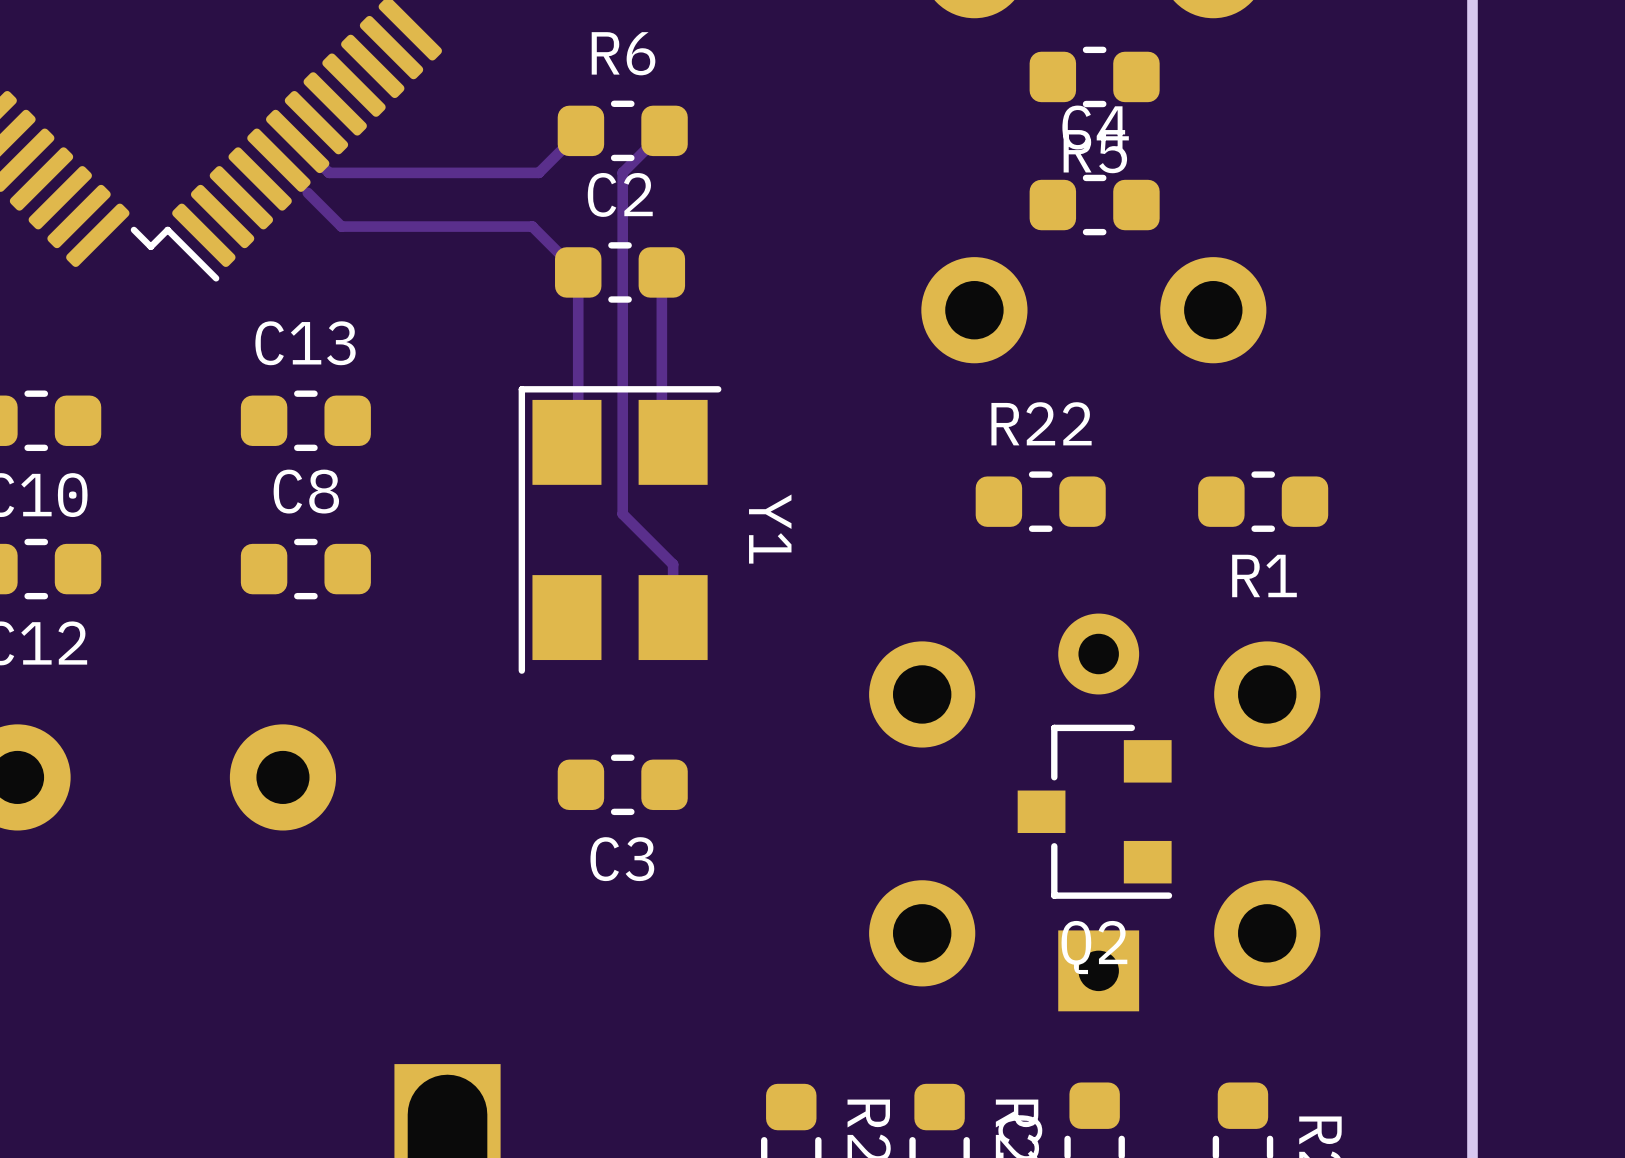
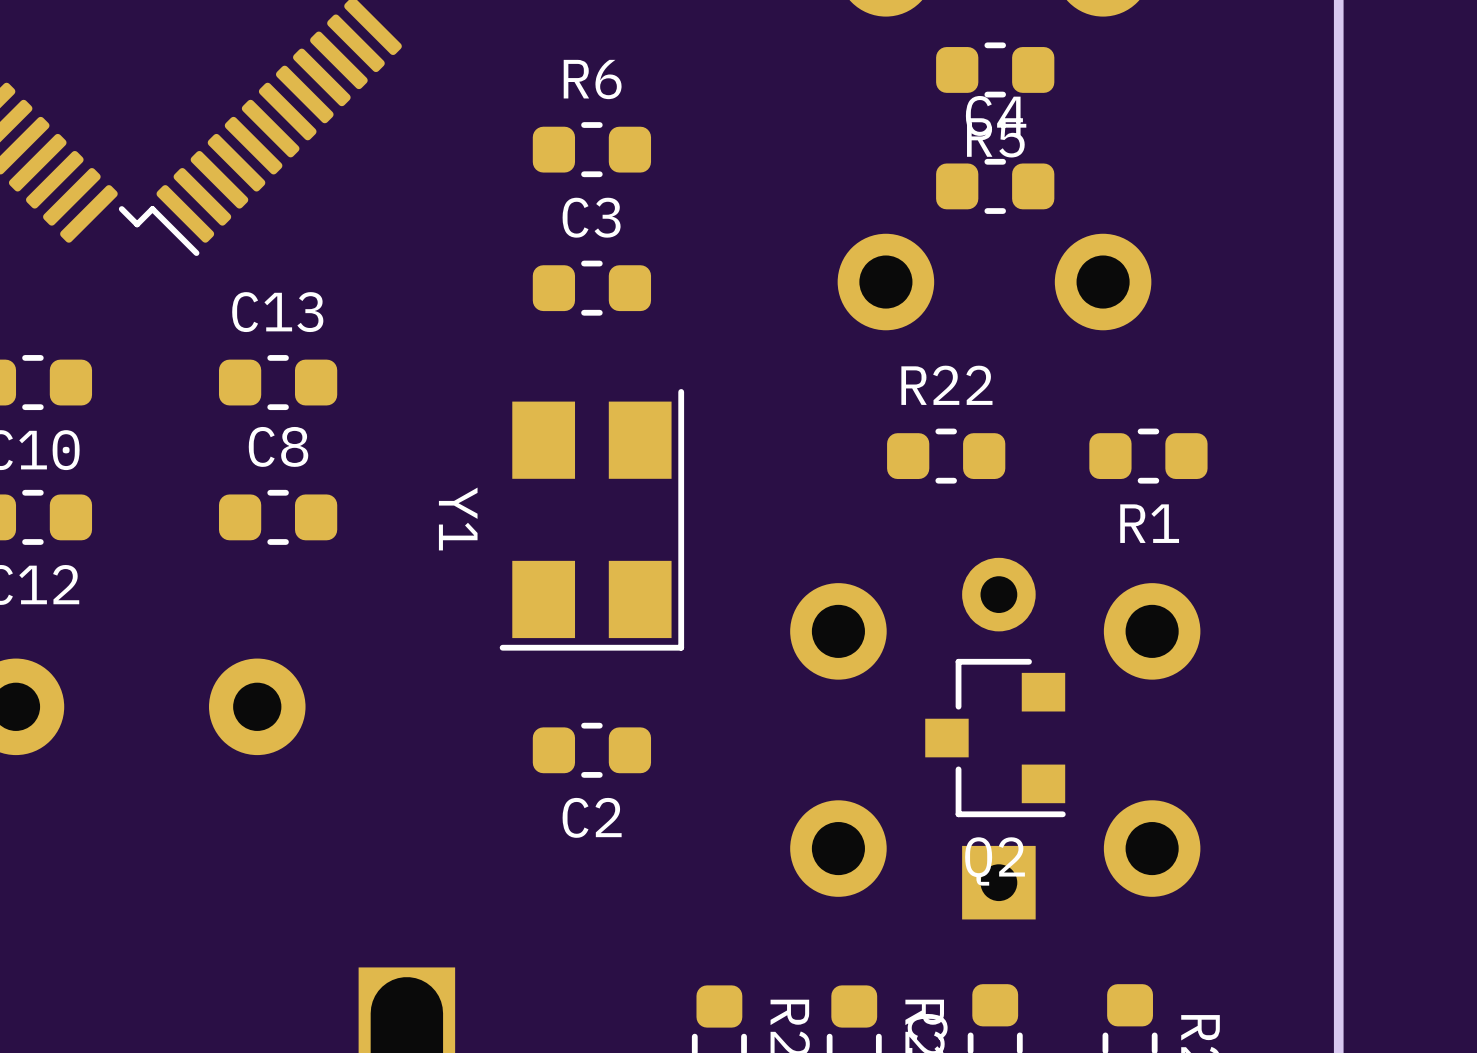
track: (580, 130) (538, 172) (329, 172) (297, 141) -> none
R6 position: (622, 130) -> (591, 149)
track: (664, 130) (622, 172) (622, 514) (673, 564) (673, 617) -> none
track: (307, 192) (341, 226) (532, 226) (578, 272) (578, 431) (566, 442) -> none
C2 name position: C2 (620, 194) -> C2 (592, 817)
C2 position: (620, 272) -> (591, 750)
track: (661, 272) (661, 431) (673, 442) -> none
Y1 rotation: 0° (620, 529) -> 180° (591, 519)
C3 position: (622, 784) -> (591, 288)
C3 name position: C3 (622, 859) -> C3 (591, 217)

